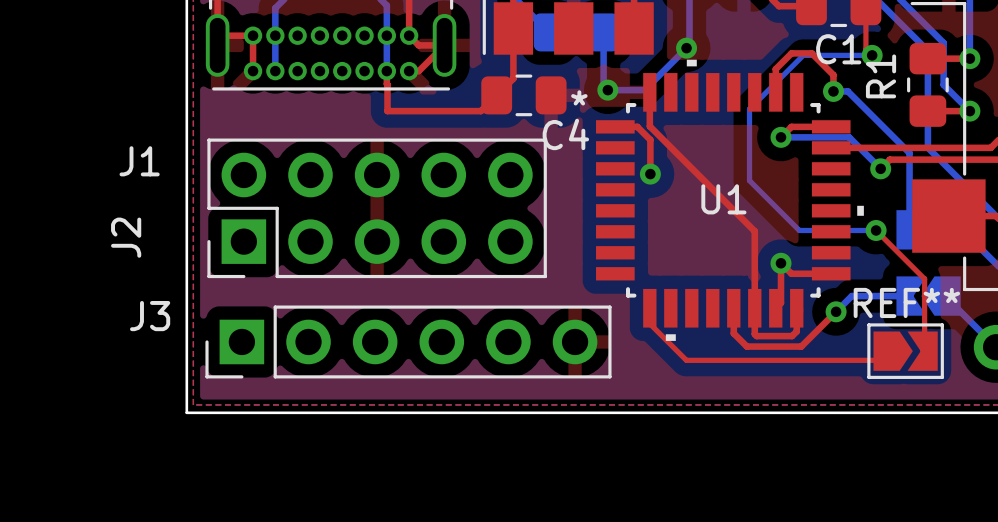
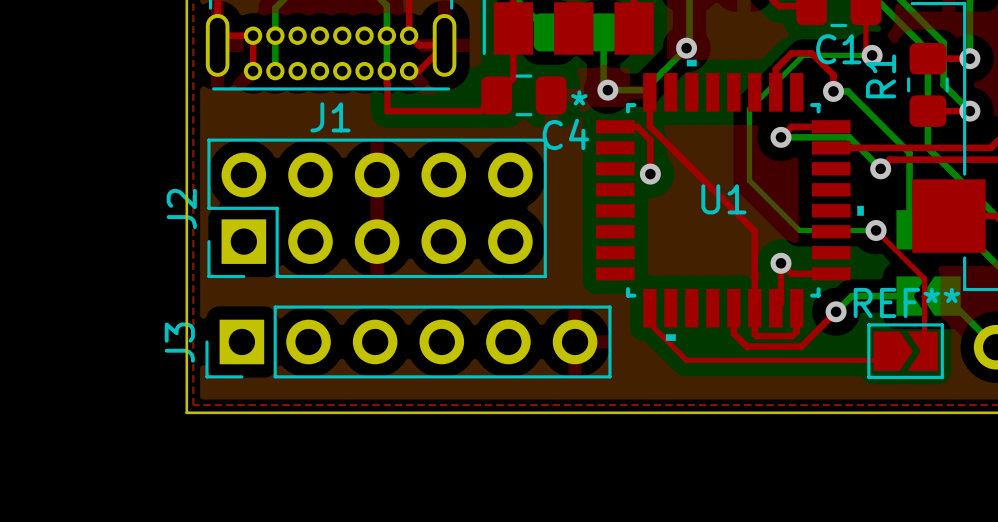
J1 name position: J1 (139, 161) -> J1 (330, 117)
J2 name position: J2 (126, 237) -> J2 (181, 208)
J3 name rotation: 0° (150, 316) -> 90° counterclockwise (179, 342)

